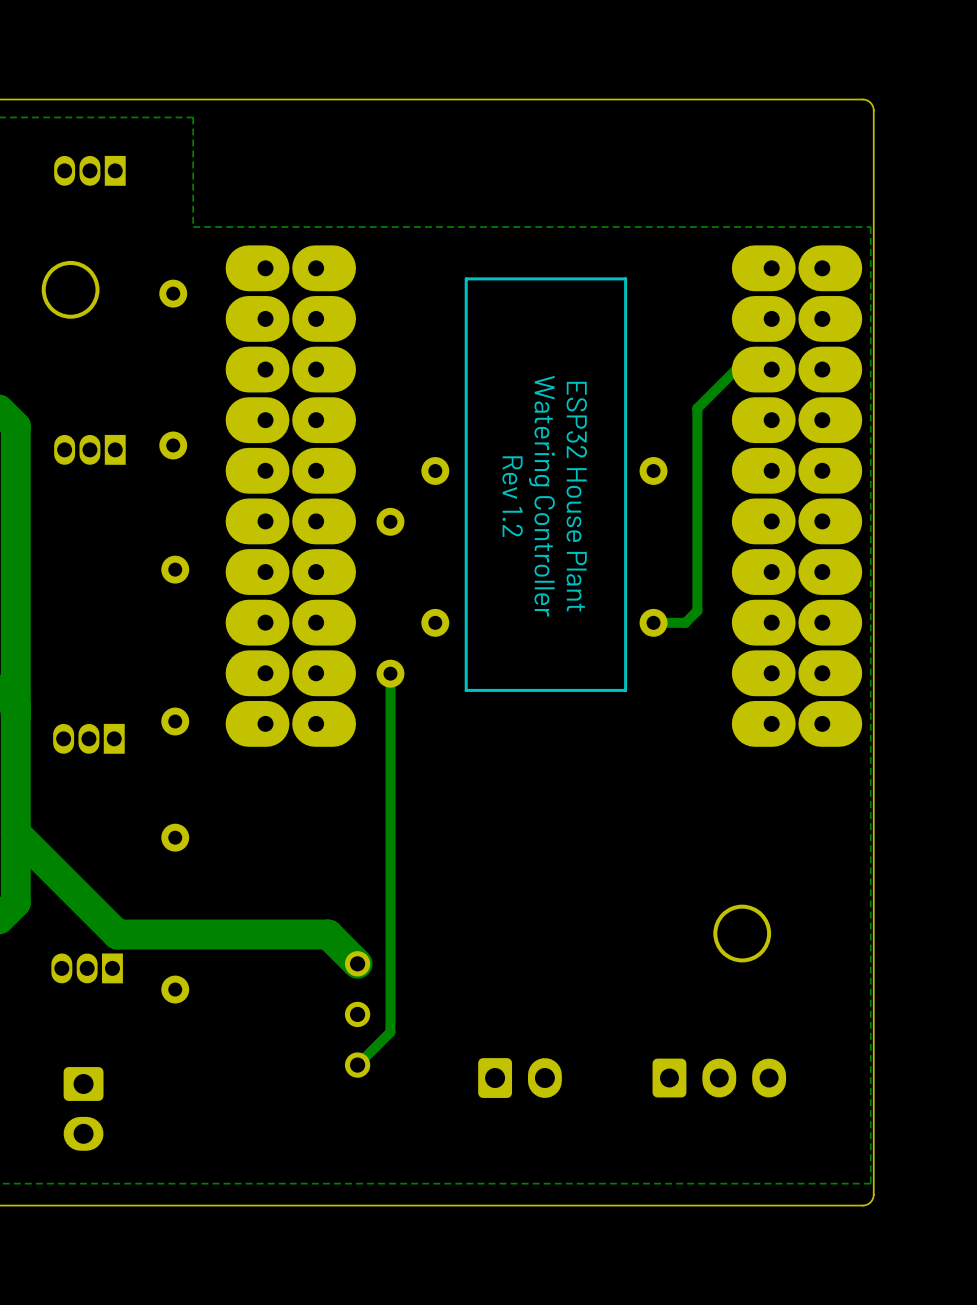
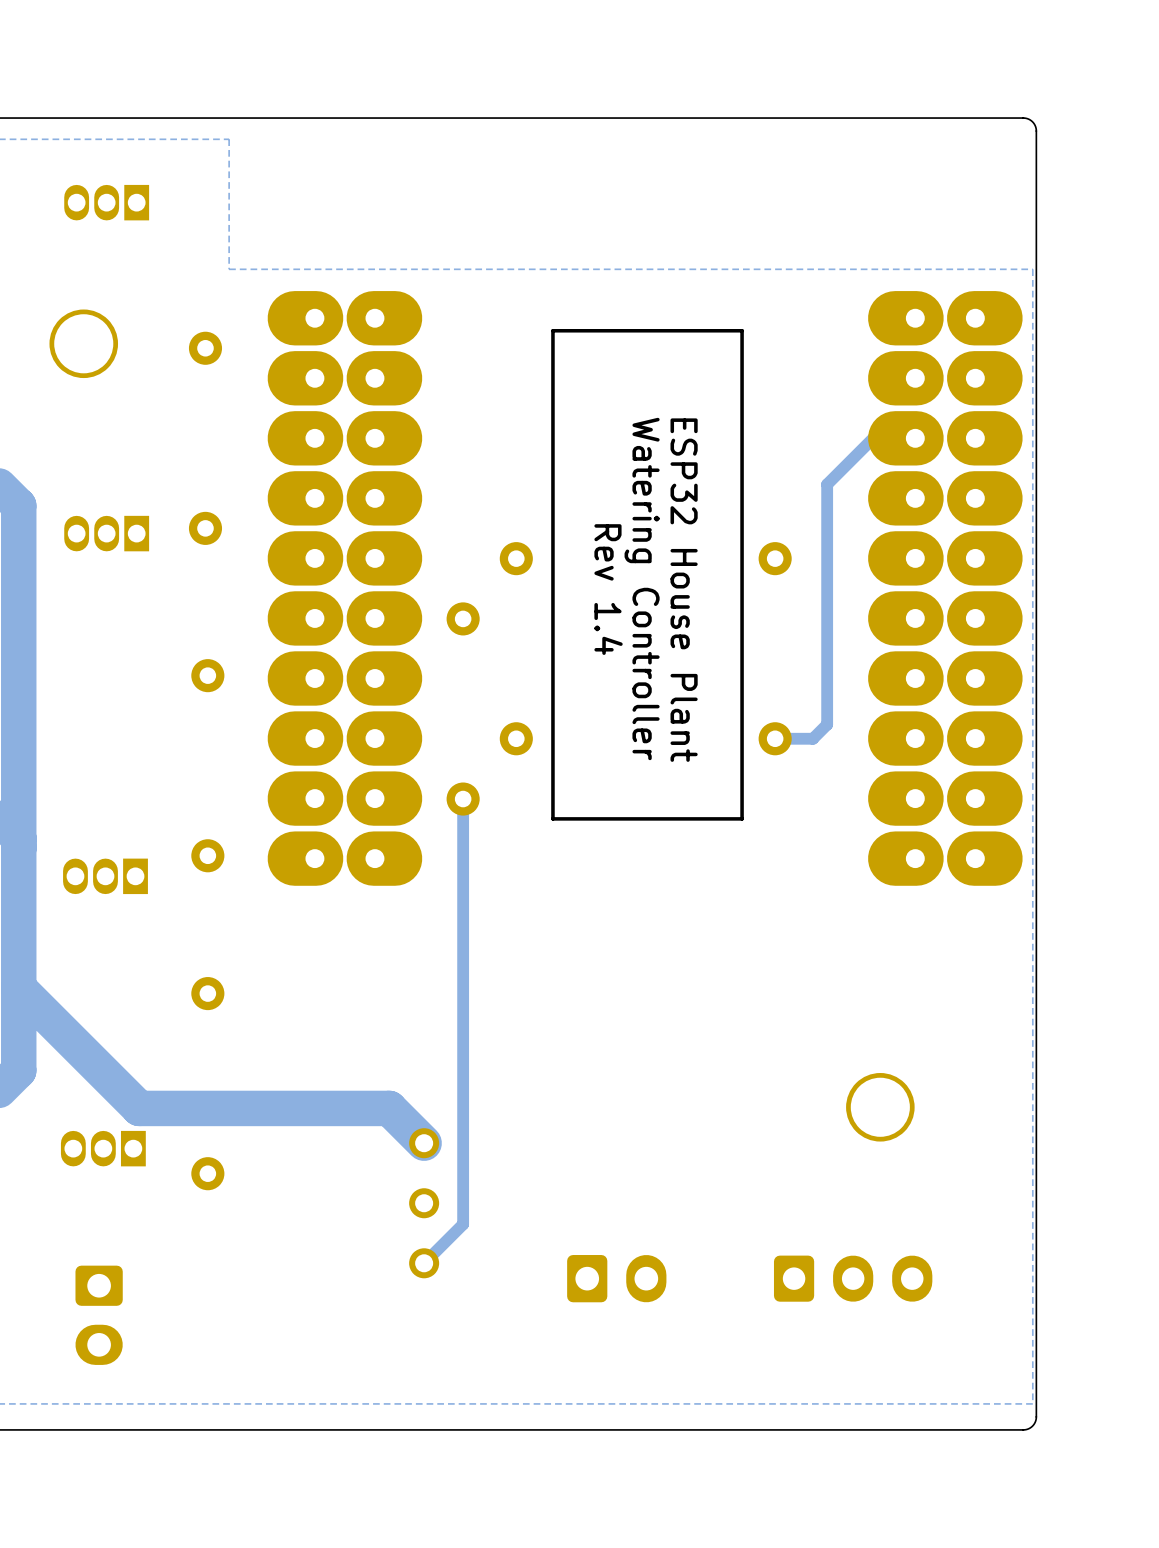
text: Rev 1.2 (512, 496) -> Rev 1.4 (608, 589)

